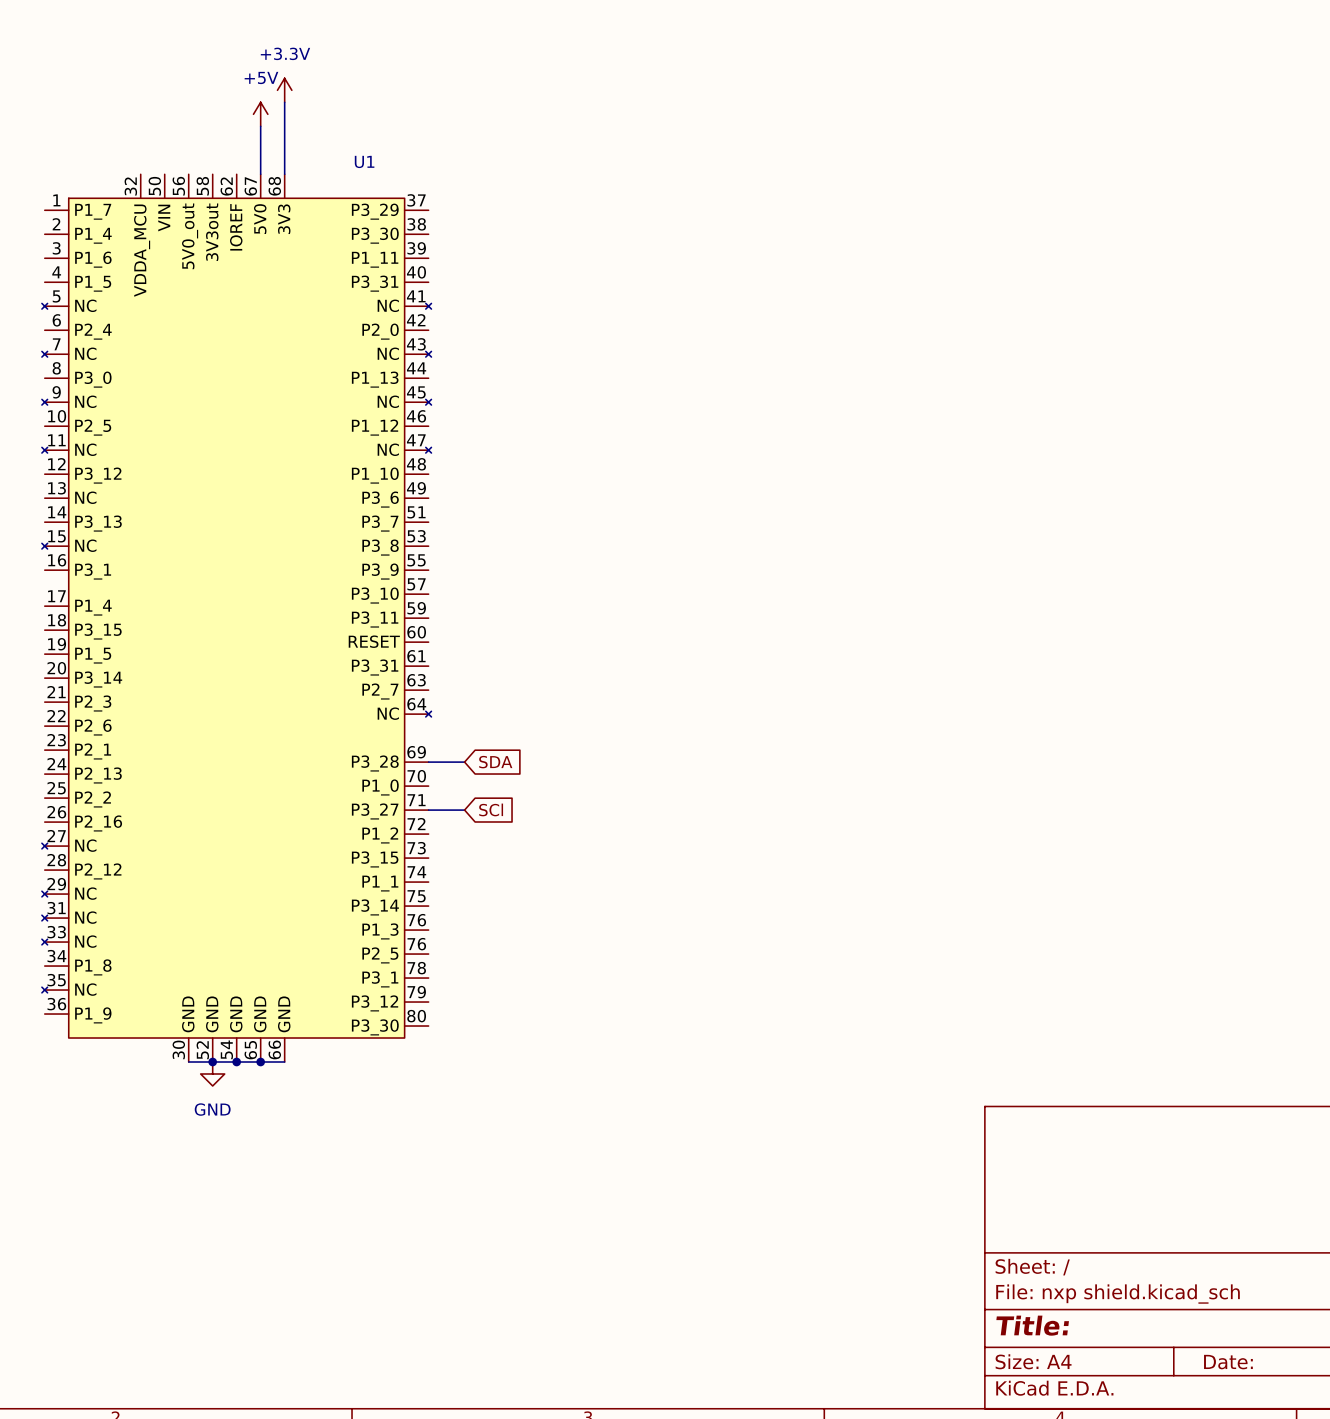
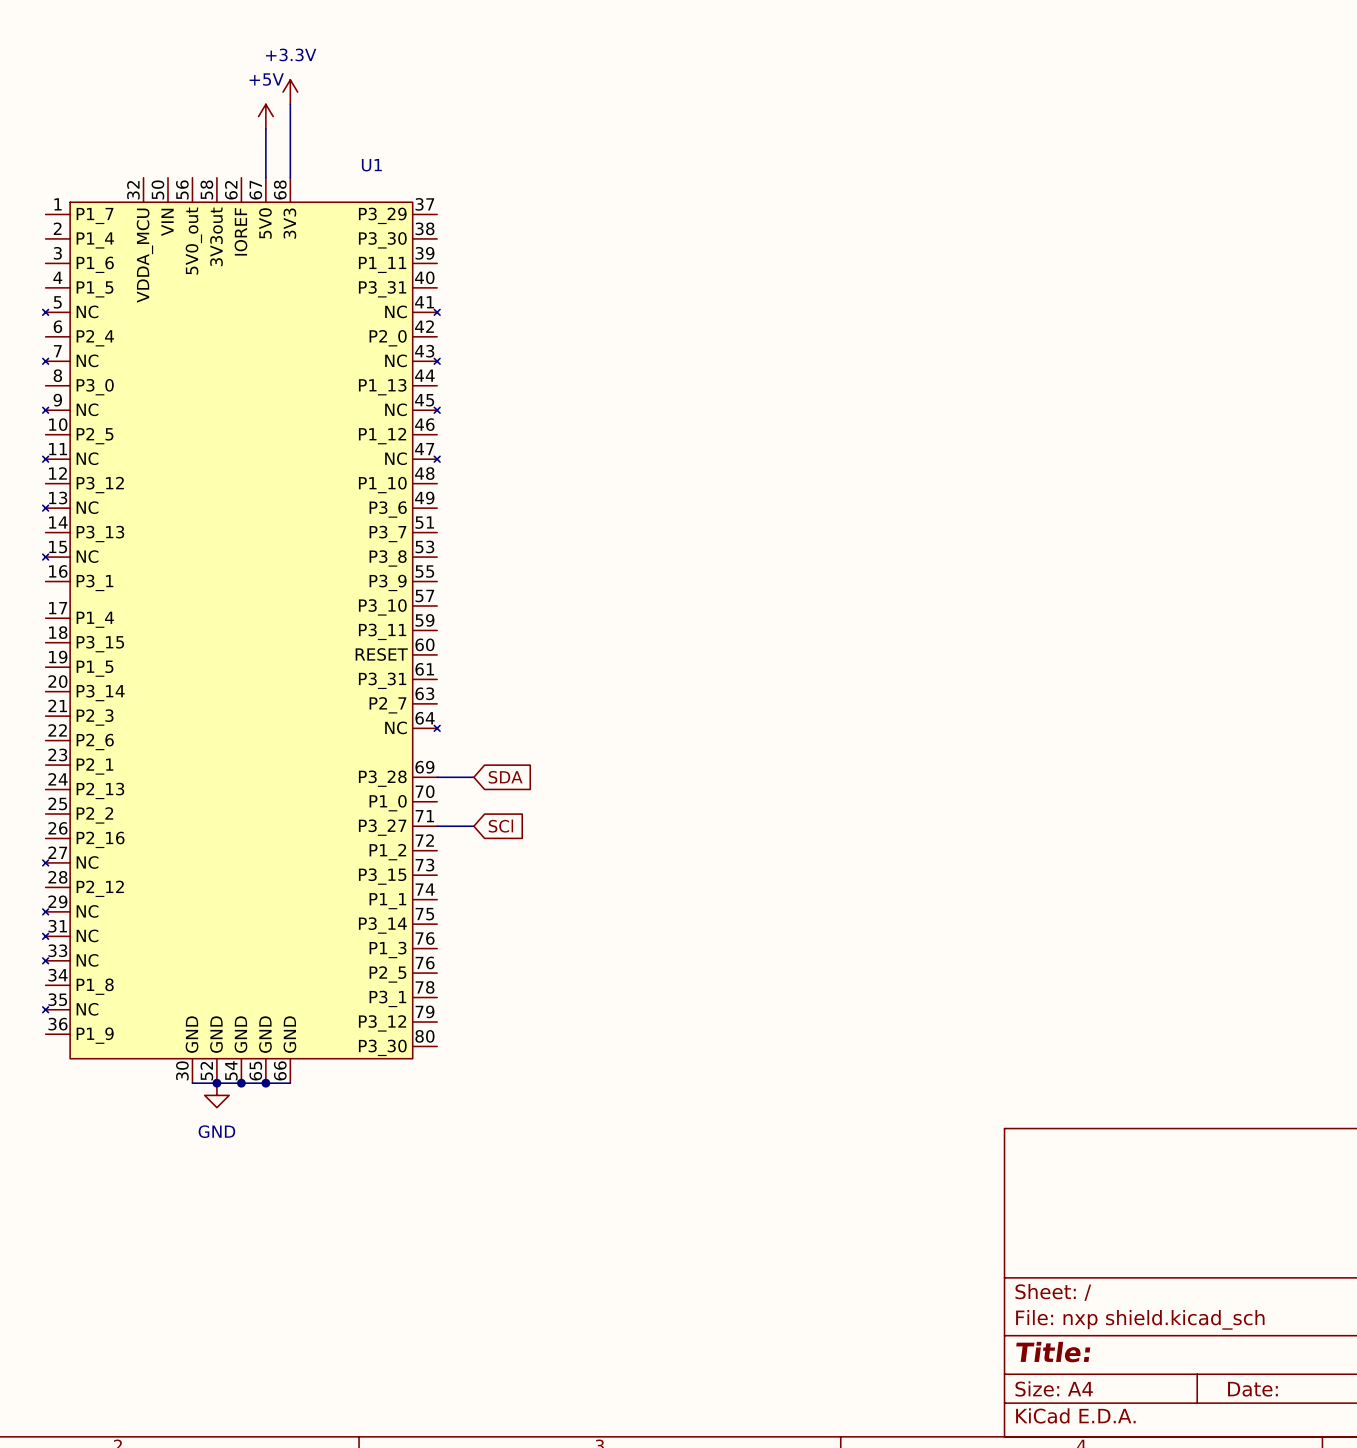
U1 symbol: [41, 174, 432, 1063] -> [42, 177, 441, 1084]

